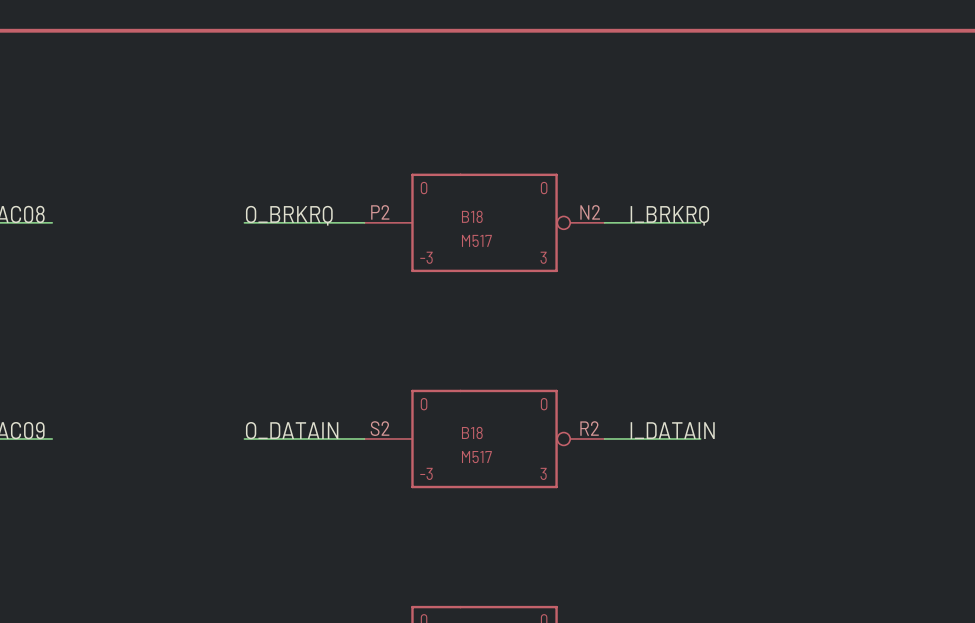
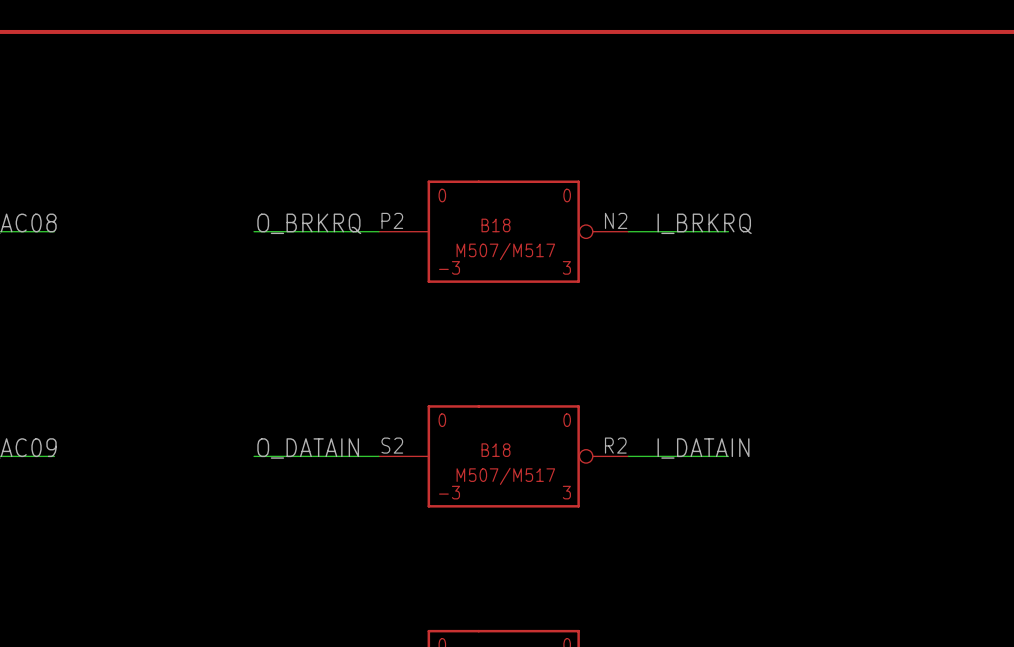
B18 text: none -> M507/M517 (505, 251)
B18 value: M517 (476, 240) -> none
B18 text: none -> M507/M517 (505, 476)
B18 value: M517 (476, 457) -> none

